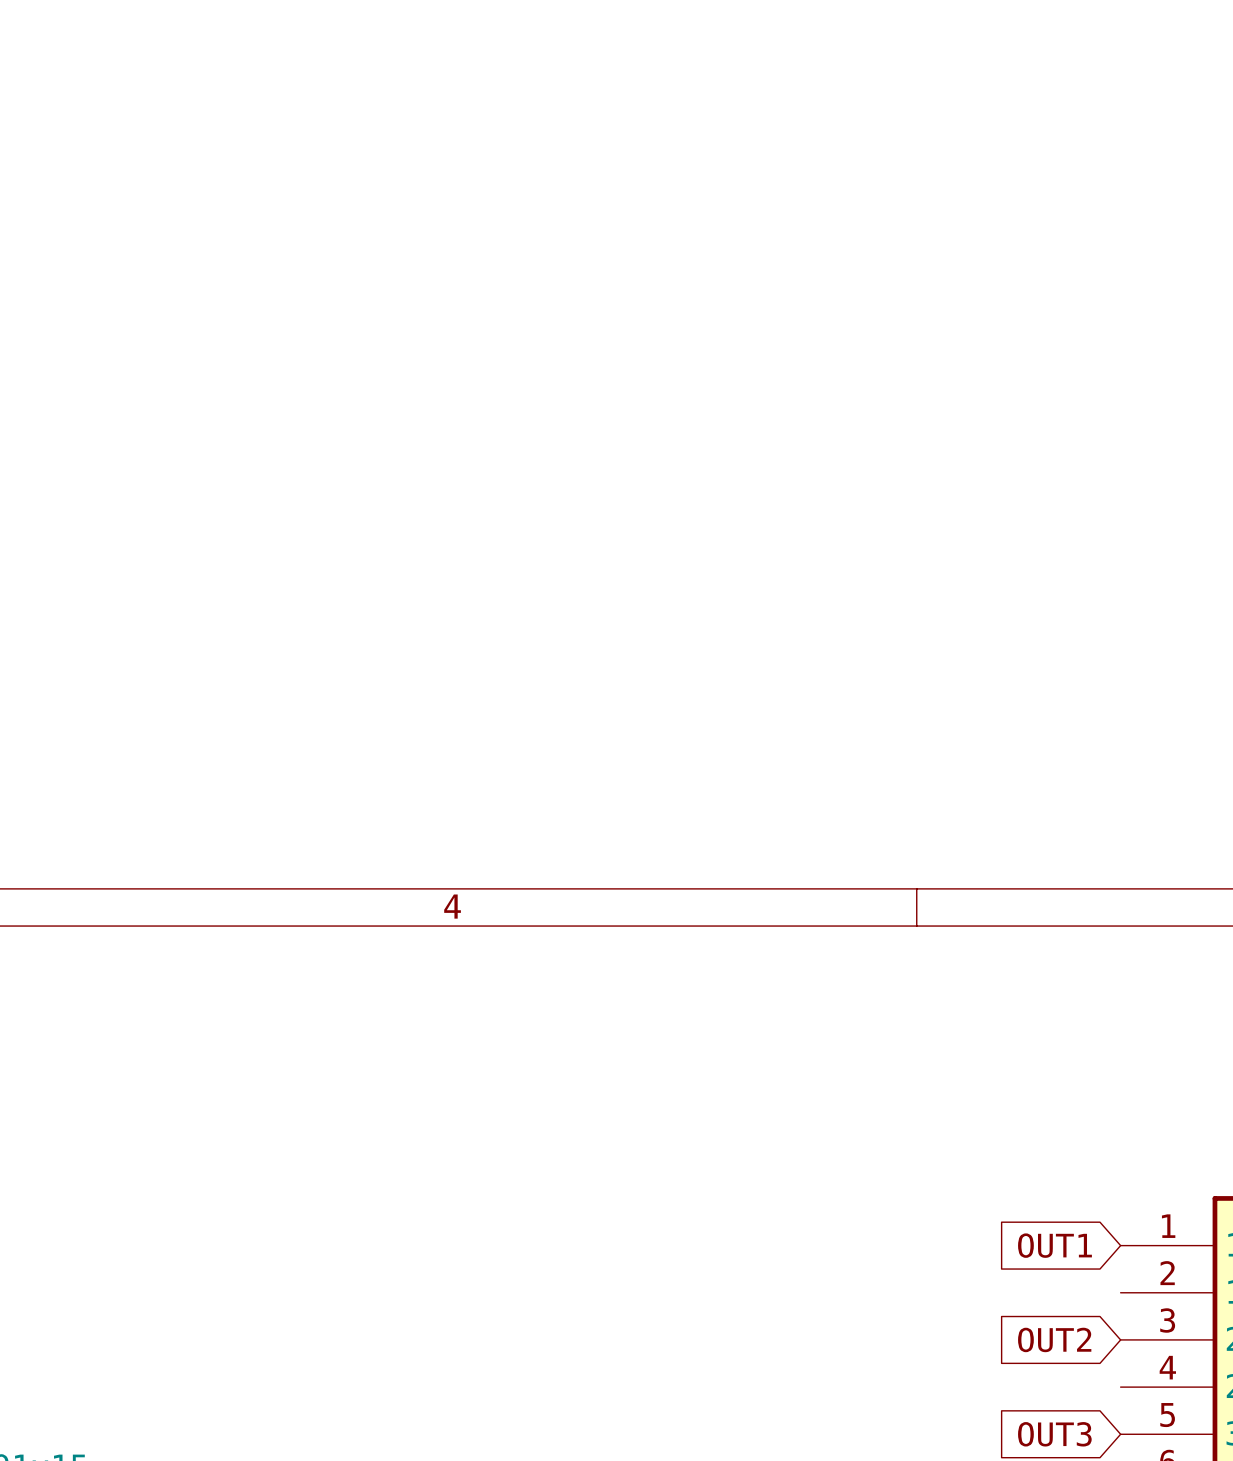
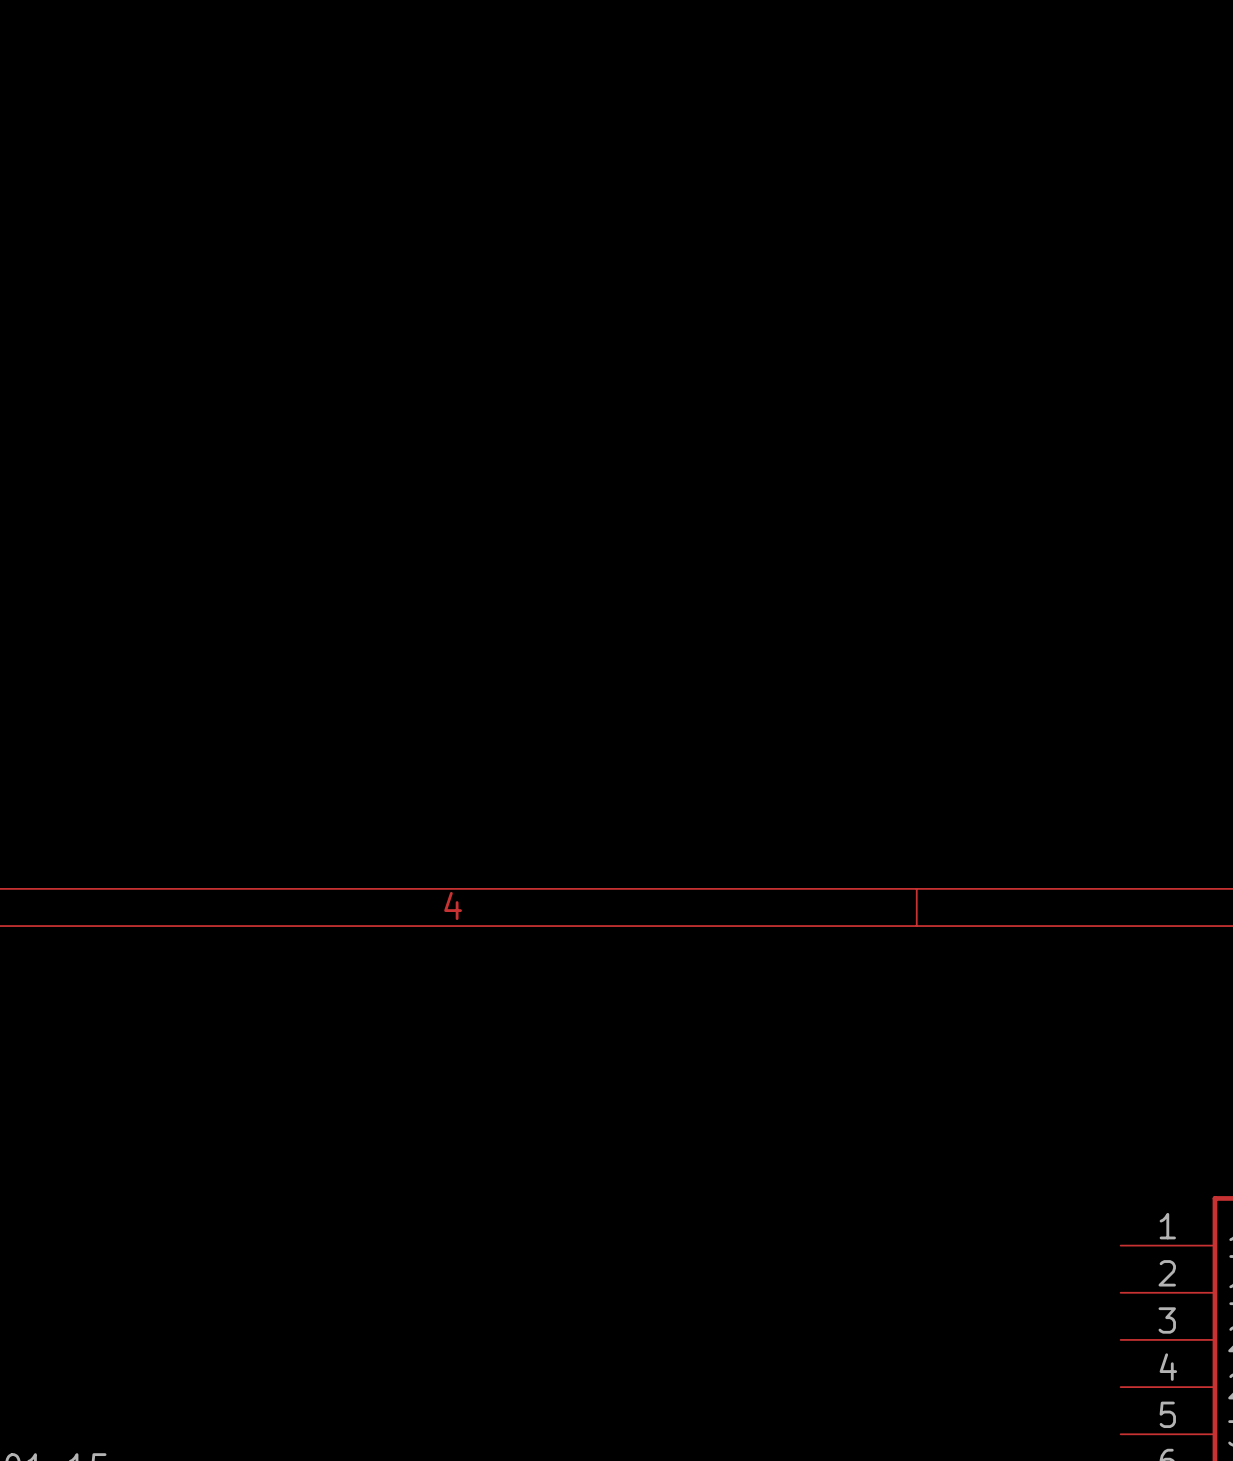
global label: OUT1 (1054, 1245) -> none
global label: OUT2 (1054, 1339) -> none
global label: OUT3 (1054, 1434) -> none

